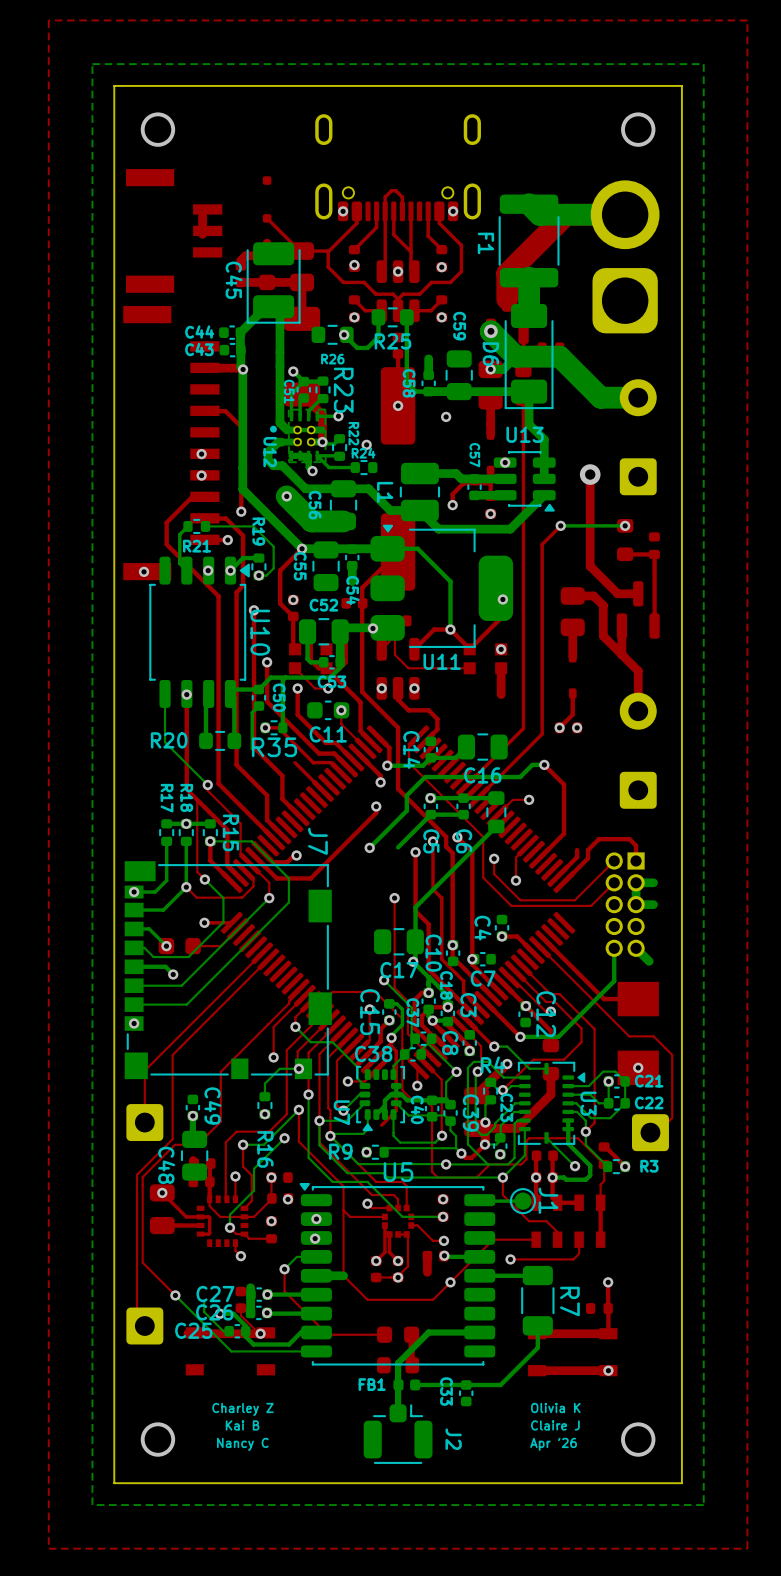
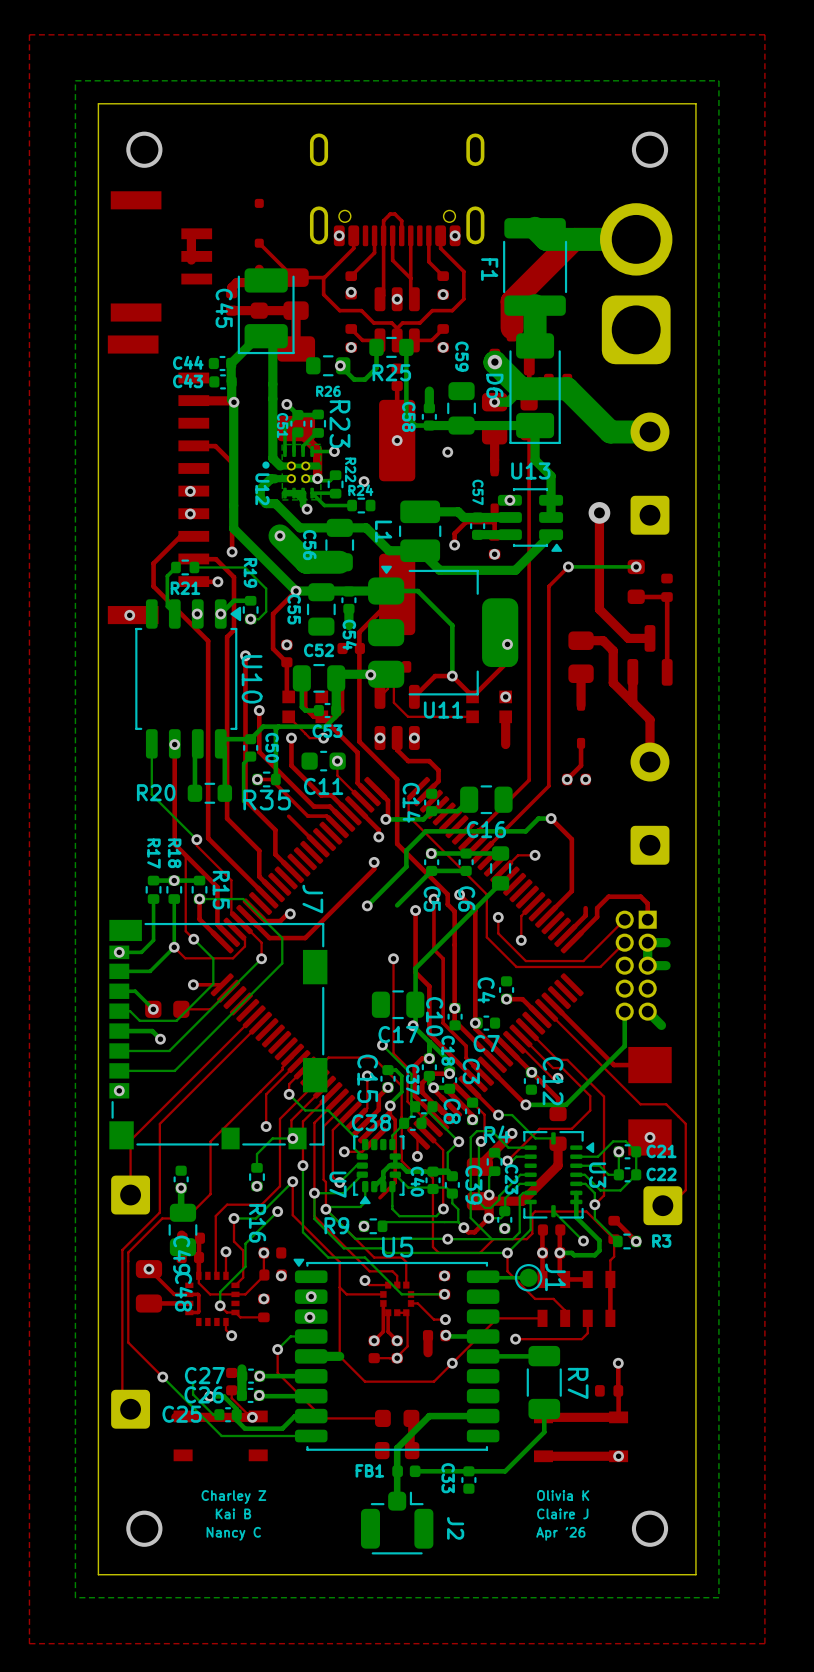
C49 name position: C49 (212, 1105) -> C49 (182, 1255)
C48 name position: C48 (166, 1165) -> C48 (183, 1292)

